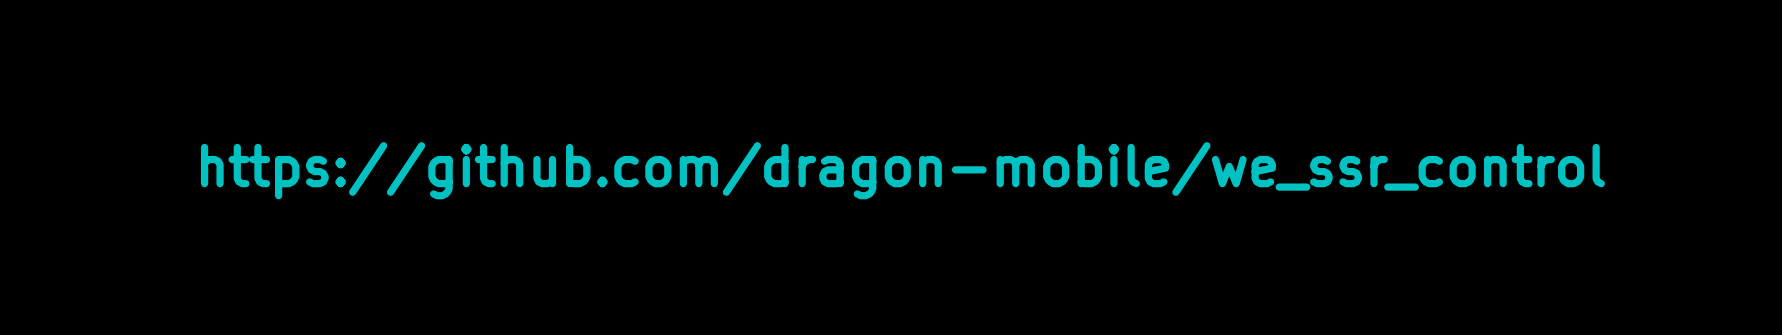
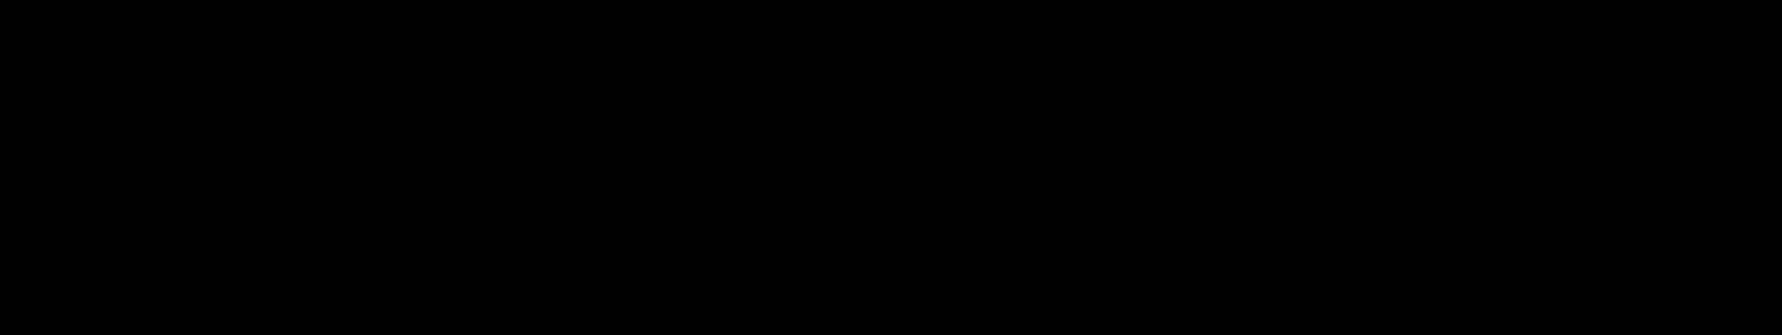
text: https://github.com/dragon-mobile/we_ssr_control (902, 170) -> none

